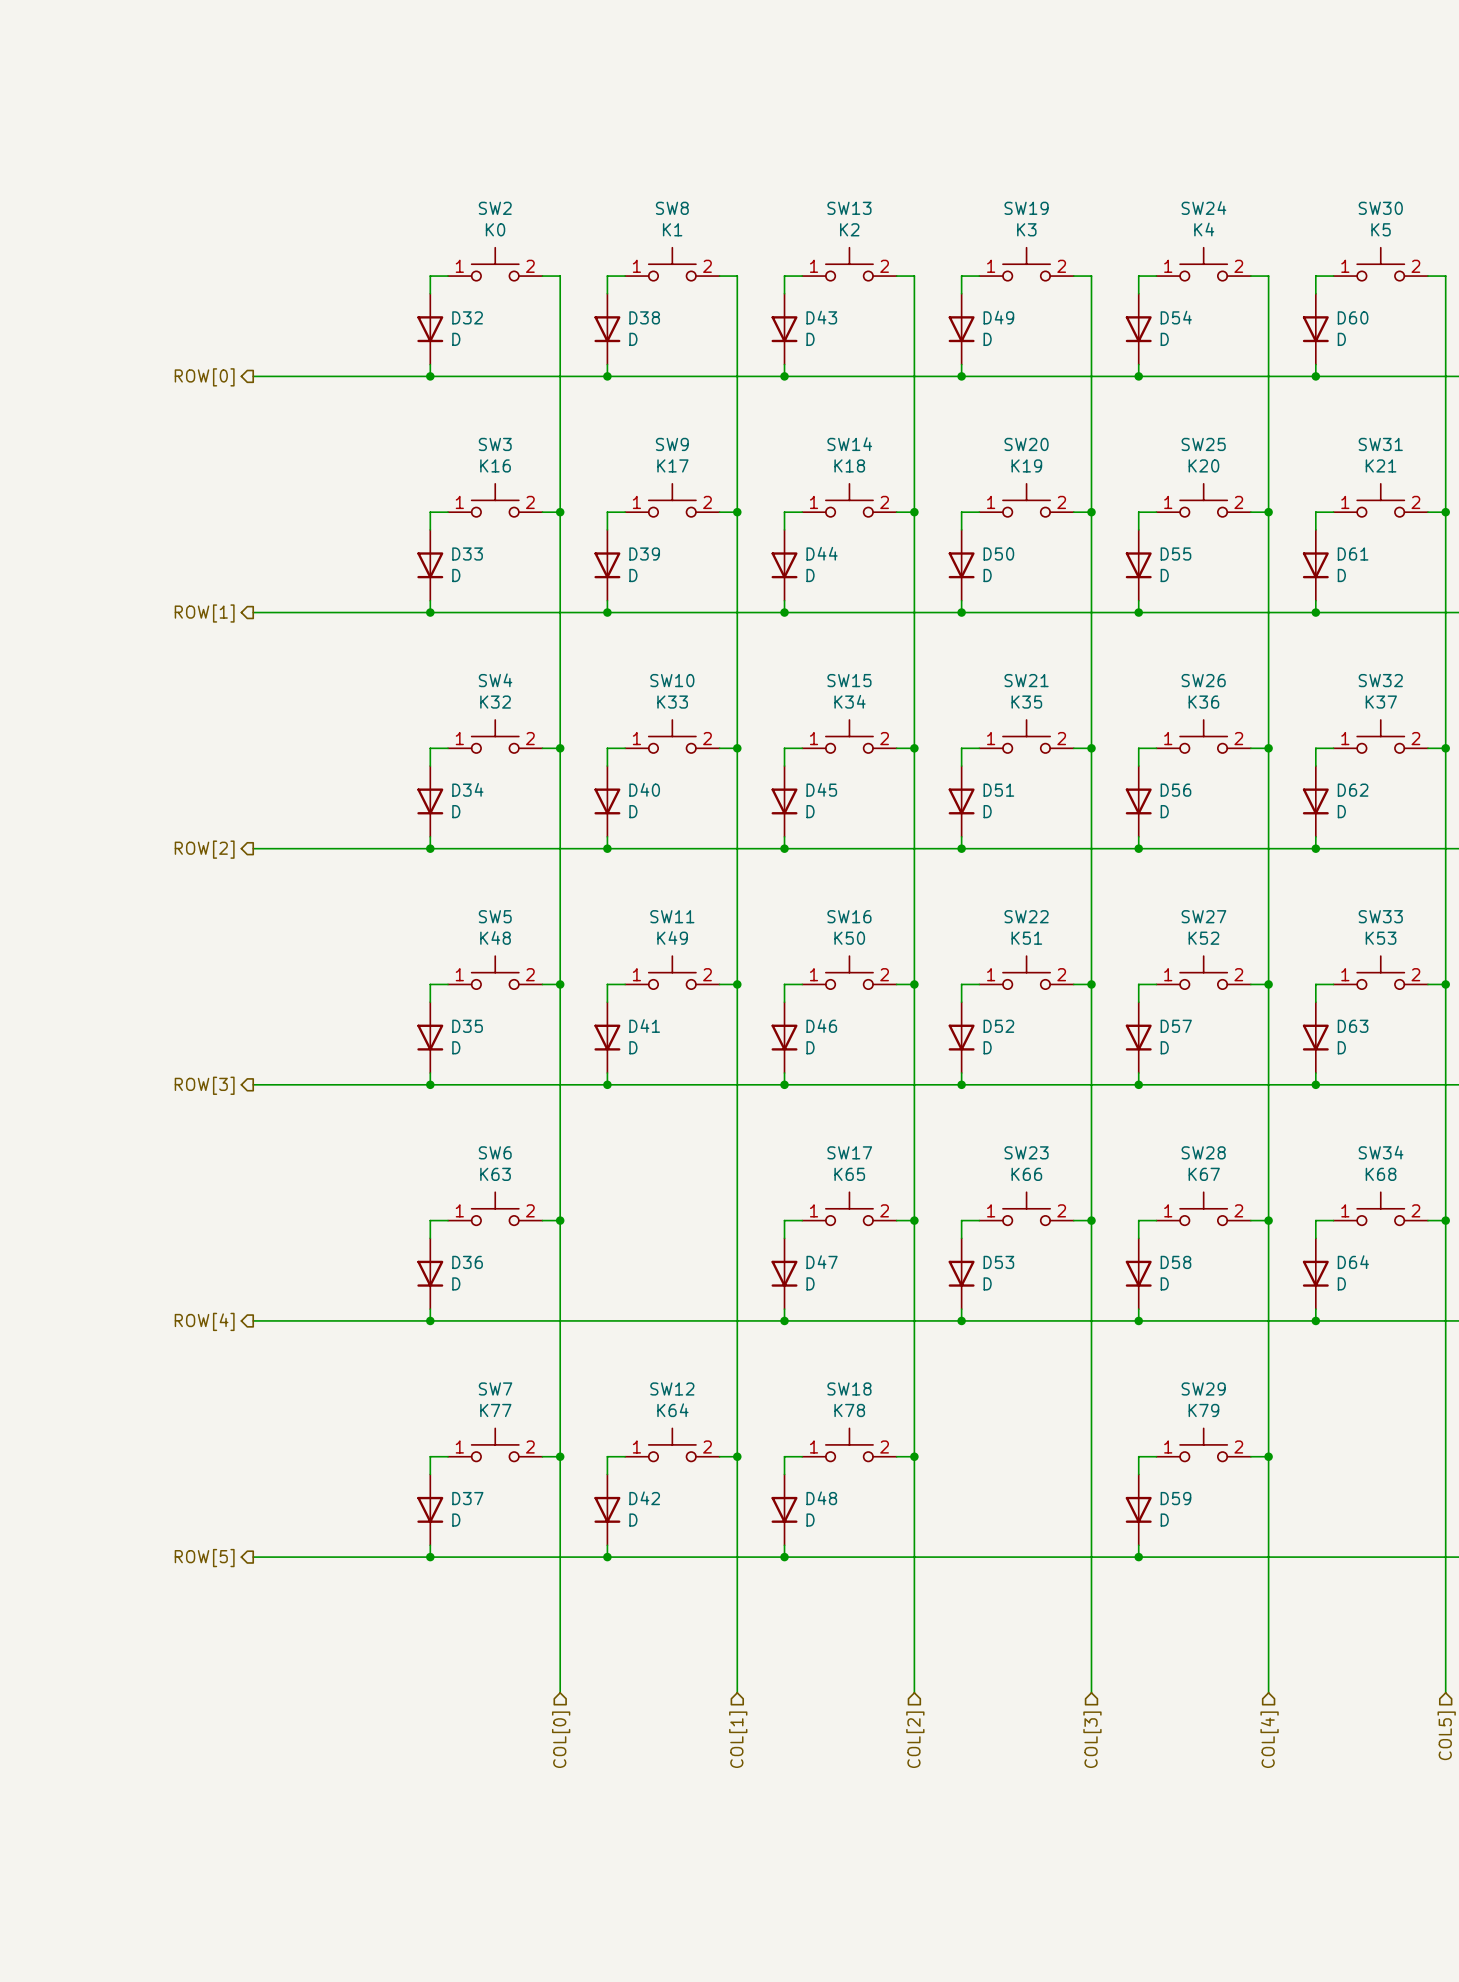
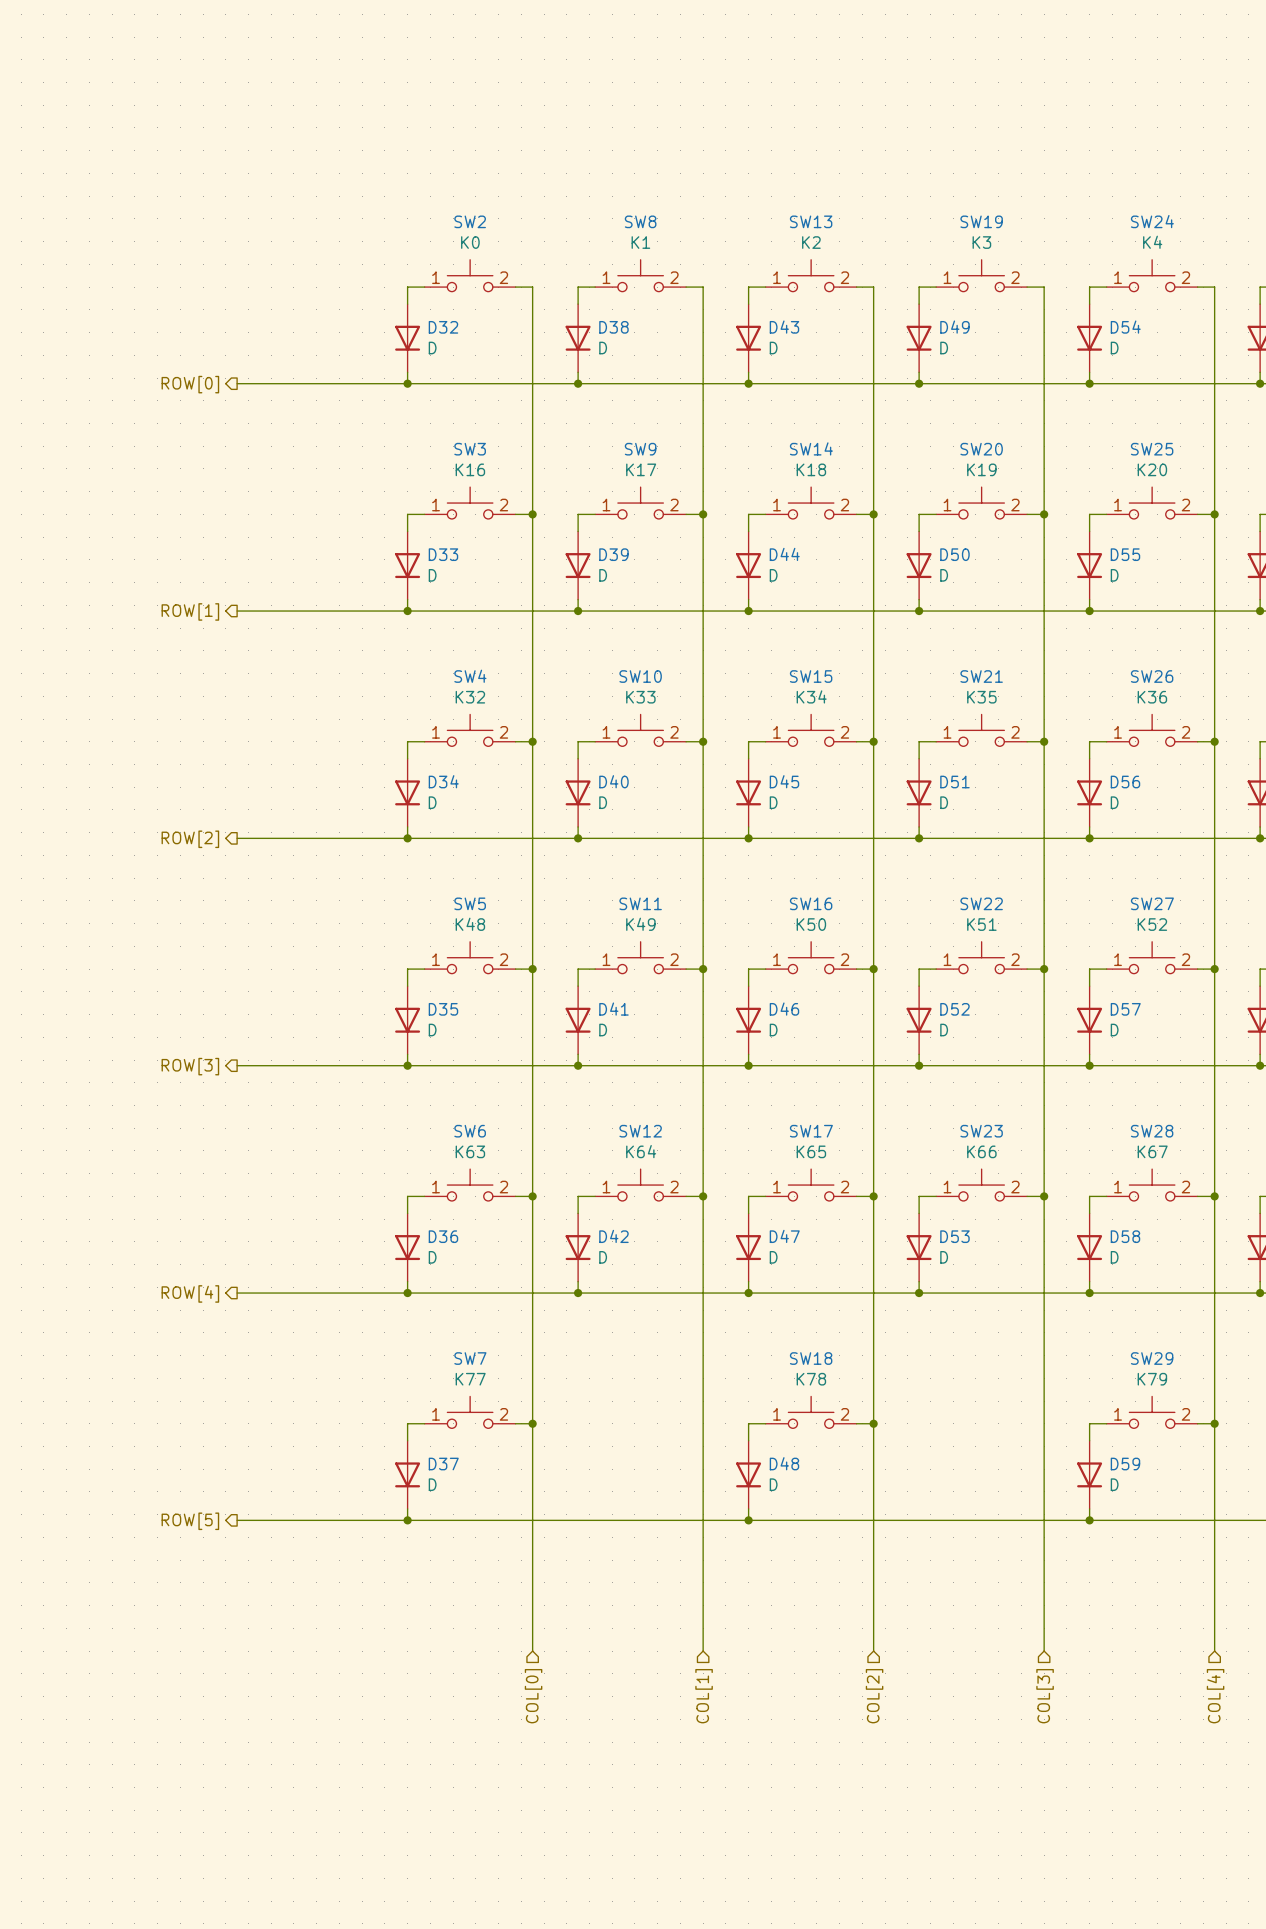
wire: none -> (595, 1196) (578, 1196) (578, 1213)
wire: none -> (686, 1196) (703, 1196)
junction: none -> (703, 1196)
wire: none -> (578, 1281) (578, 1293)
junction: none -> (578, 1293)
SW12 position: (672, 1444) -> (640, 1185)
wire: (625, 1456) (607, 1456) (607, 1474) -> none
wire: (719, 1456) (737, 1456) -> none
junction: (737, 1456) -> none
D42 position: (607, 1509) -> (578, 1247)
wire: (607, 1545) (607, 1557) -> none
junction: (607, 1557) -> none

